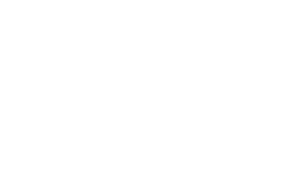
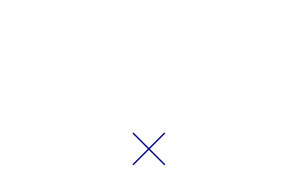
no-connect mark: none -> (148, 148)

